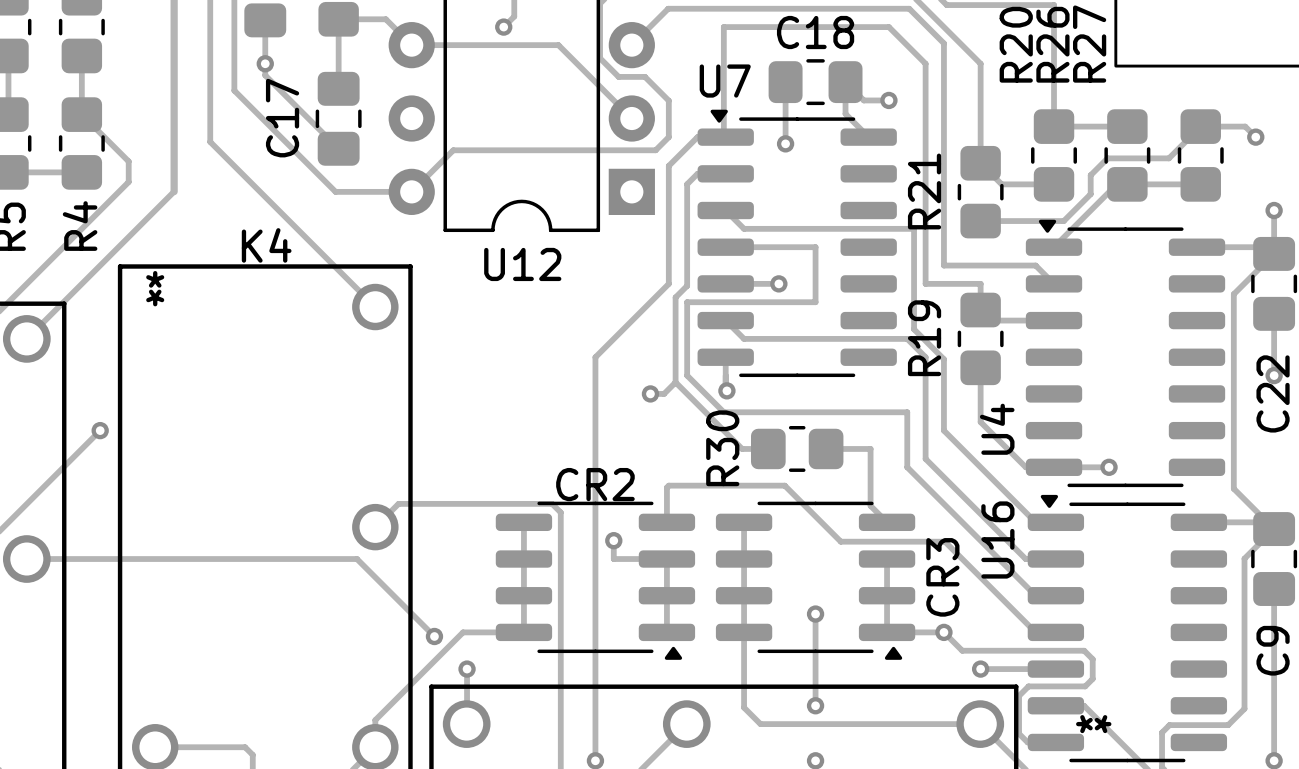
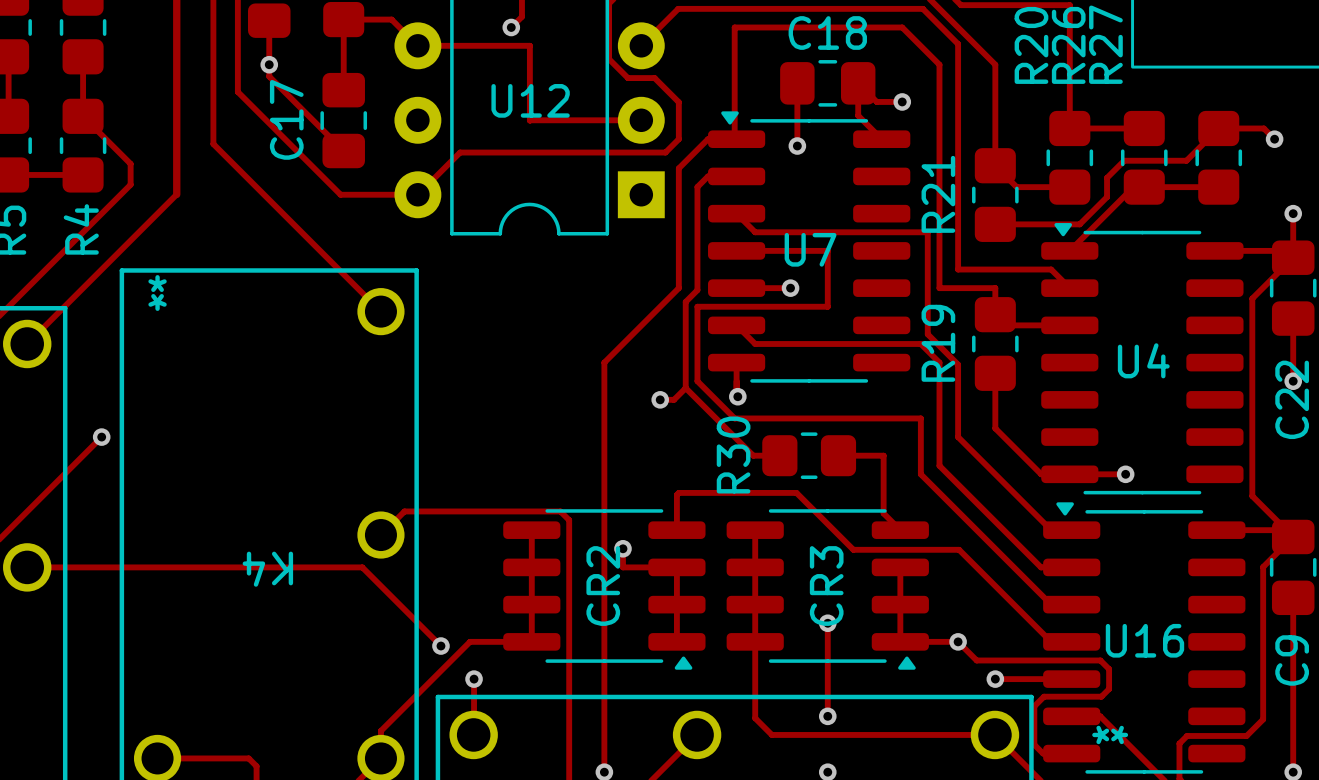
track: (522, 45) (558, 45) (631, 118) -> (529, 45) (529, 120) (659, 120)
U7 name position: U7 (725, 81) -> U7 (810, 249)
K4 name rotation: 0° (266, 245) -> 180° (267, 569)
K4 name position: K4 (266, 245) -> K4 (267, 569)
U12 name position: U12 (522, 264) -> U12 (530, 100)
U4 name rotation: 0° (997, 429) -> 90° clockwise (1143, 360)
U4 name position: U4 (997, 429) -> U4 (1143, 360)
CR2 name rotation: 0° (595, 484) -> 90° counterclockwise (603, 586)
U16 name rotation: 0° (997, 539) -> 90° clockwise (1144, 640)
U16 name position: U16 (997, 539) -> U16 (1144, 640)
CR3 name position: CR3 (942, 577) -> CR3 (826, 586)

